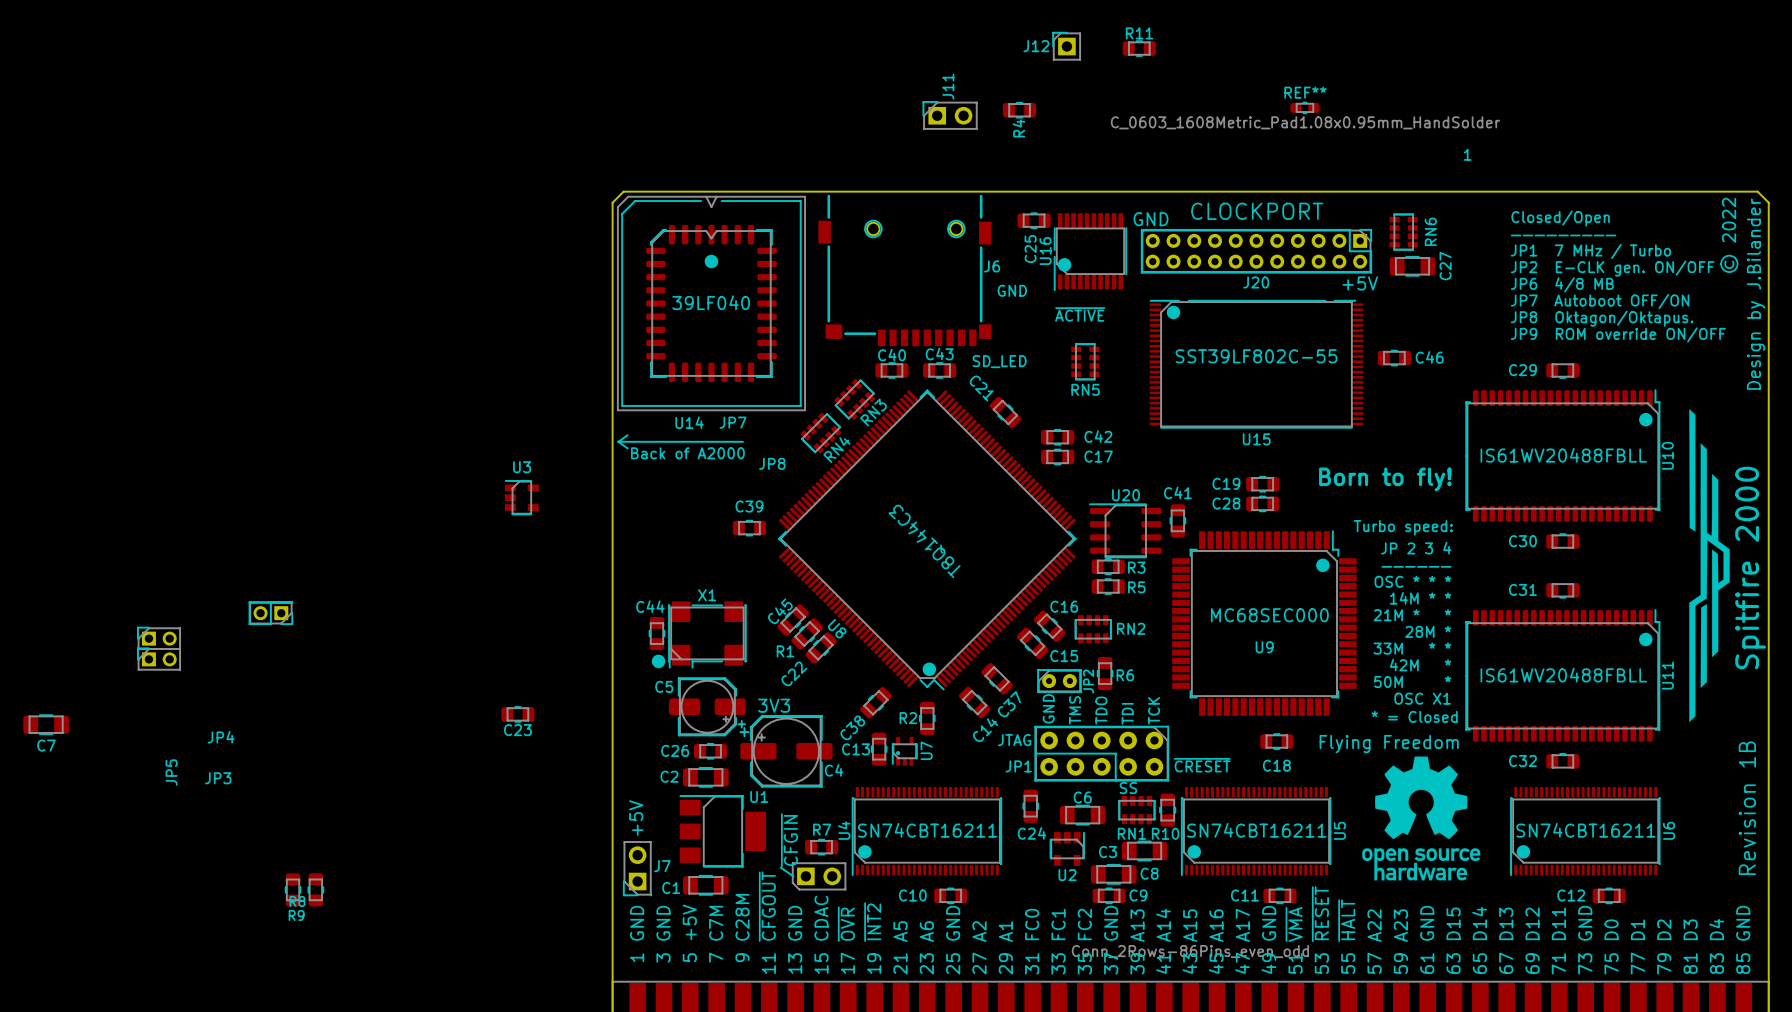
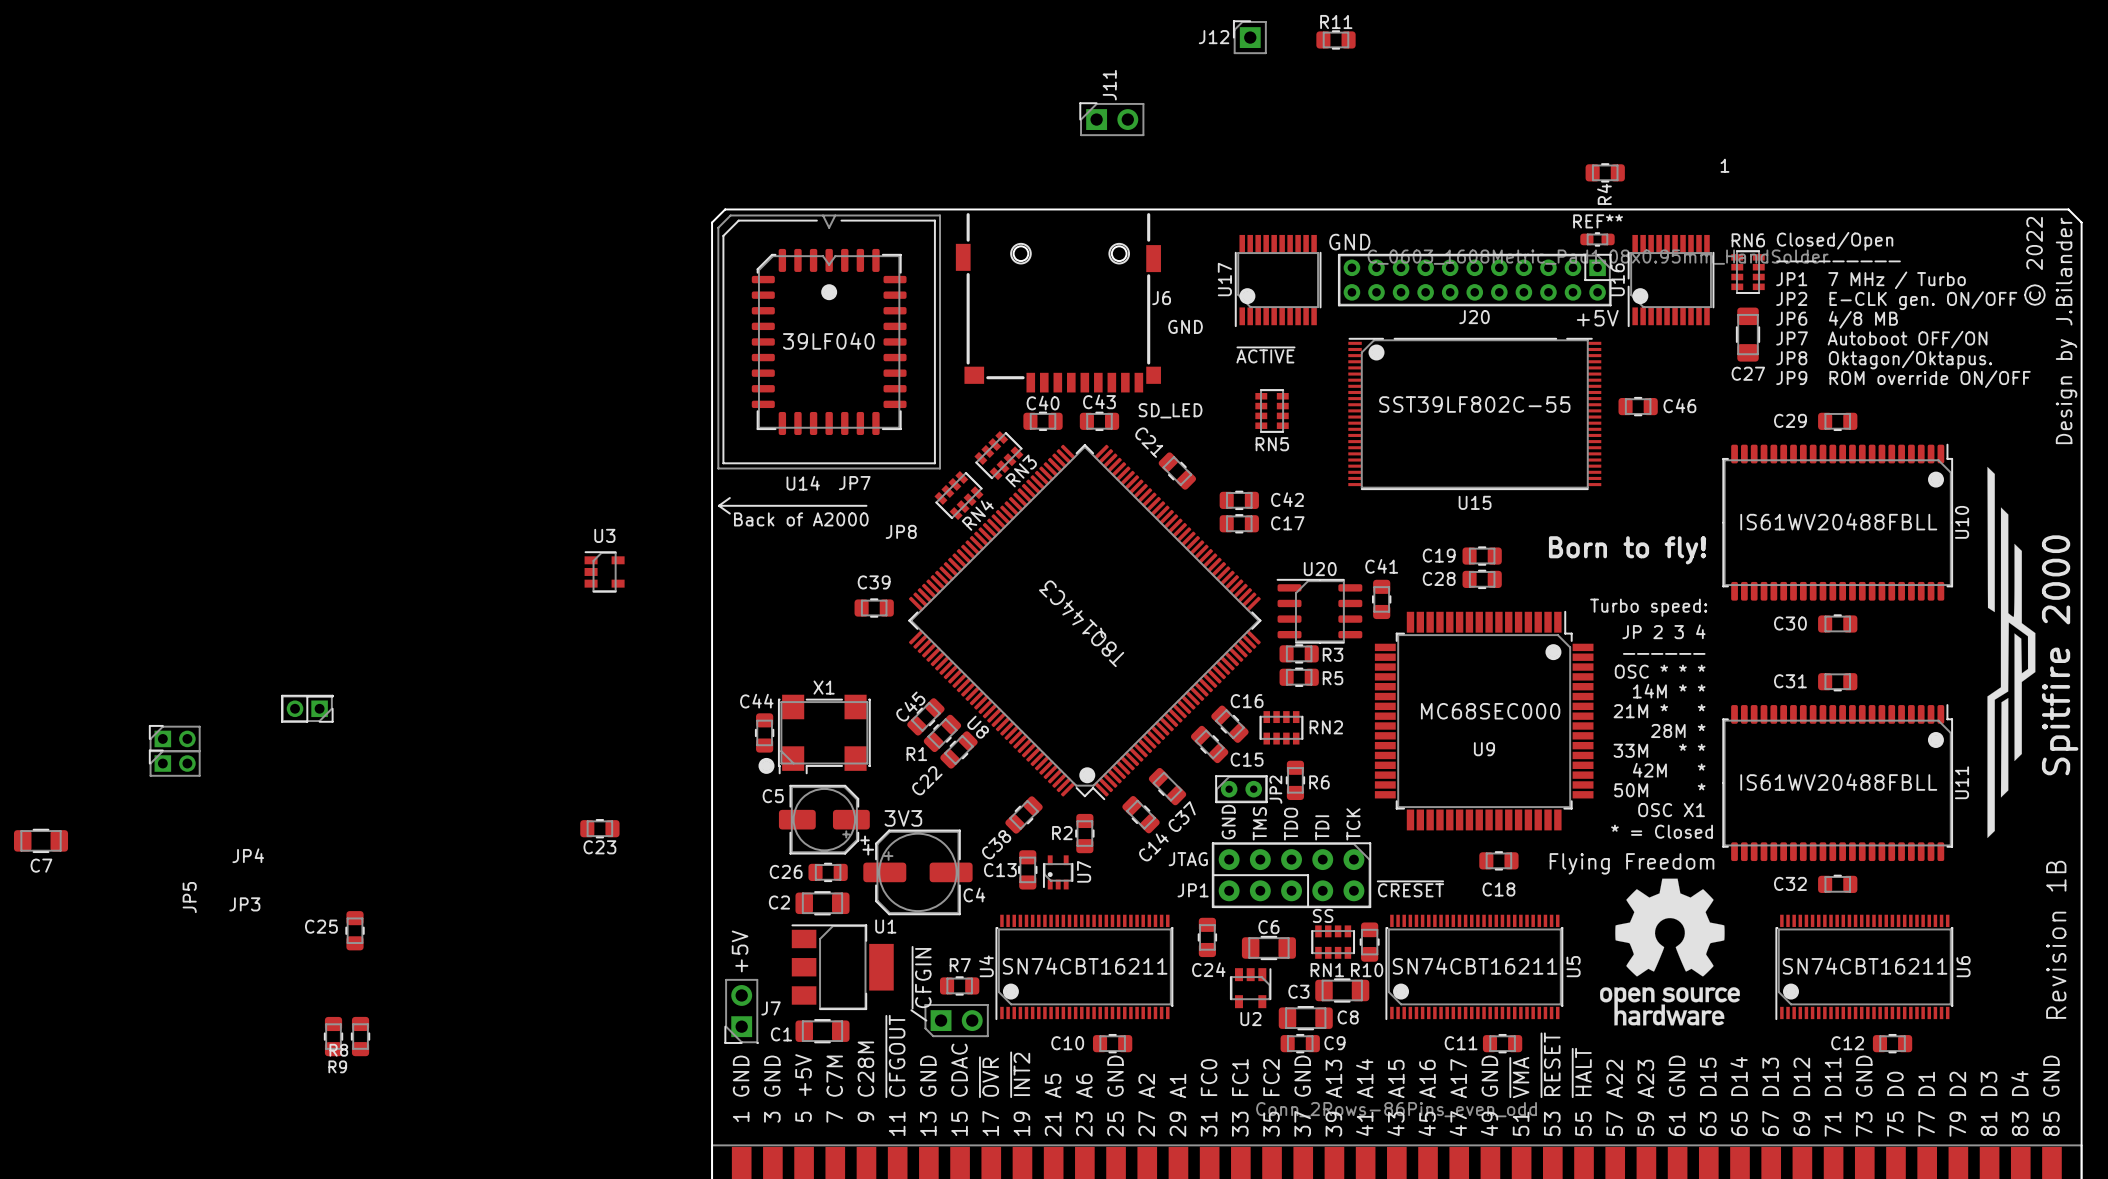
REF** position: (1304, 107) -> (1597, 239)
R4 position: (1019, 110) -> (1605, 172)
text: CLOCKPORT (1257, 211) -> none
C25 rotation: 0° (1034, 220) -> 90° clockwise (355, 930)
C25 position: (1034, 220) -> (355, 930)
RN6 name rotation: 0° (1430, 231) -> 90° clockwise (1748, 240)
RN6 name position: RN6 (1430, 231) -> RN6 (1748, 240)
RN6 position: (1403, 232) -> (1748, 272)
U16 position: (1090, 252) -> (1671, 281)
U17: none -> (1278, 281)
C27 rotation: 0° (1412, 266) -> 90° clockwise (1748, 334)
C27 position: (1412, 266) -> (1748, 334)

